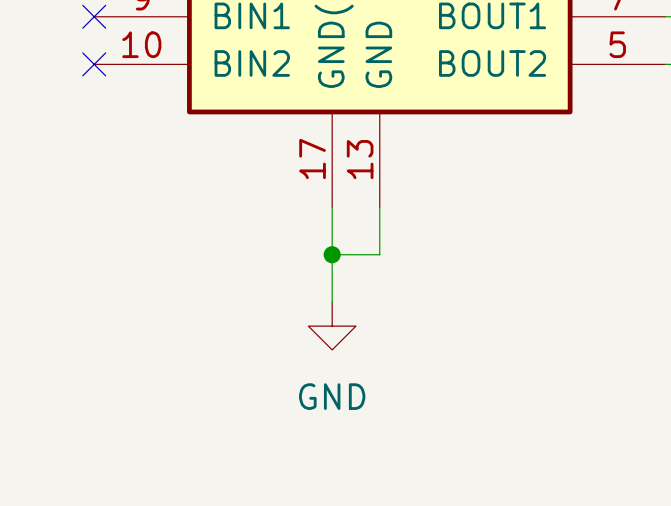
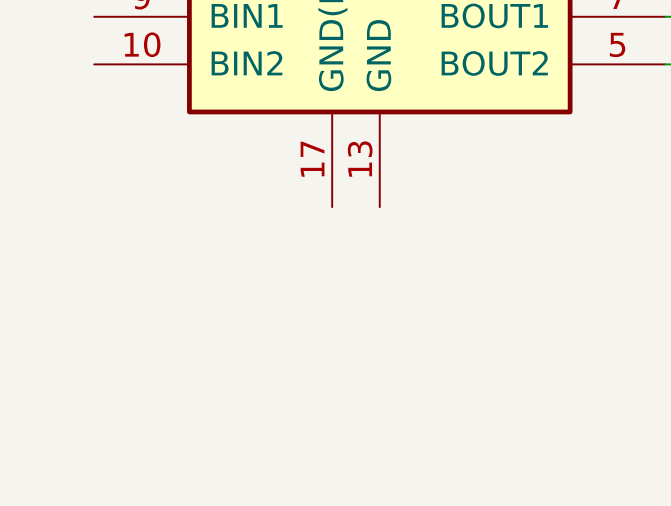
no-connect mark: (94, 16) -> none
no-connect mark: (94, 64) -> none
wire: (332, 207) (332, 302) -> none
wire: (379, 207) (379, 254) (332, 254) -> none
junction: (332, 254) -> none
power symbol: GND (332, 326) -> none

